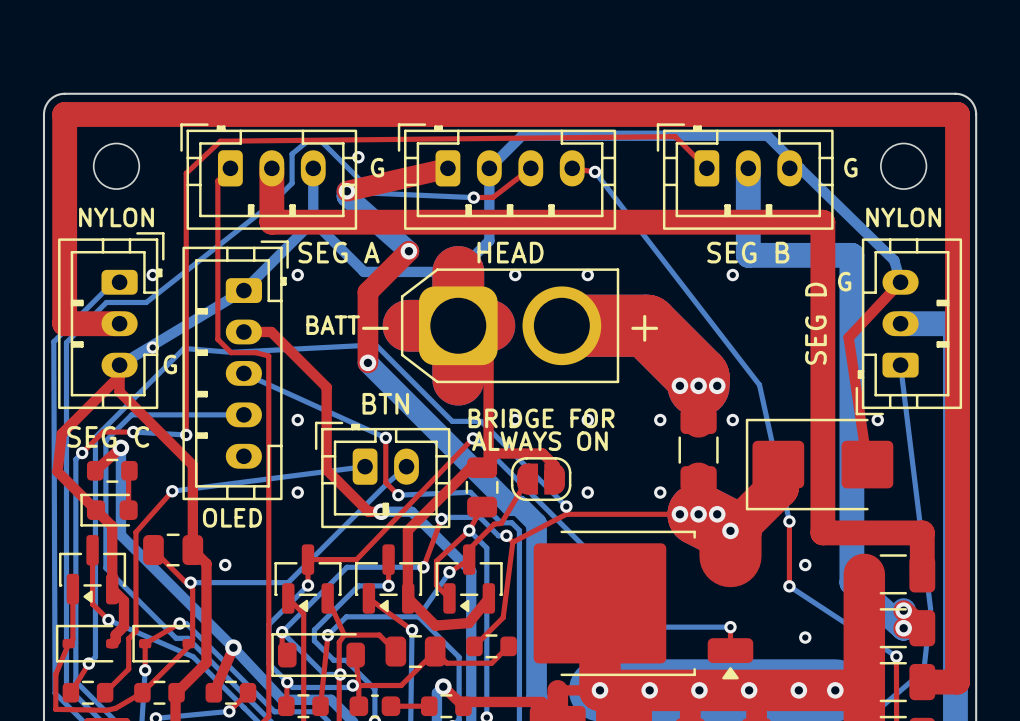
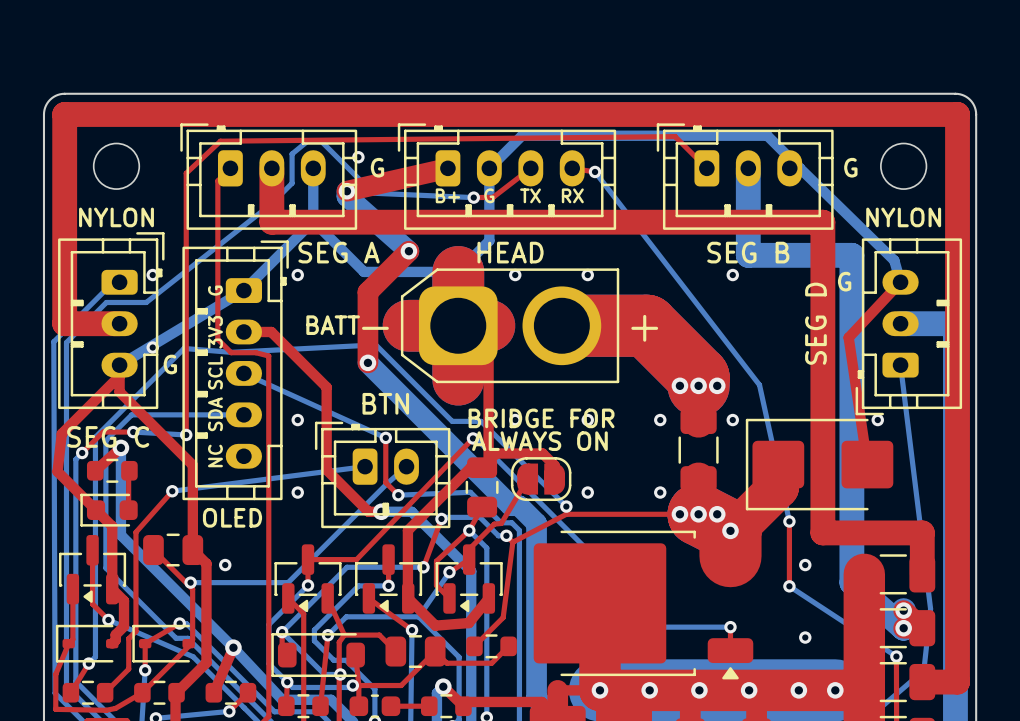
text: none -> B+ (447, 195)
text: none -> G (489, 195)
text: none -> TX (530, 195)
text: none -> RX (572, 195)
text: none -> G (215, 290)
text: none -> 3V3 (215, 332)
text: none -> SCL (215, 372)
text: none -> SDA (215, 414)
text: none -> NC (215, 455)

